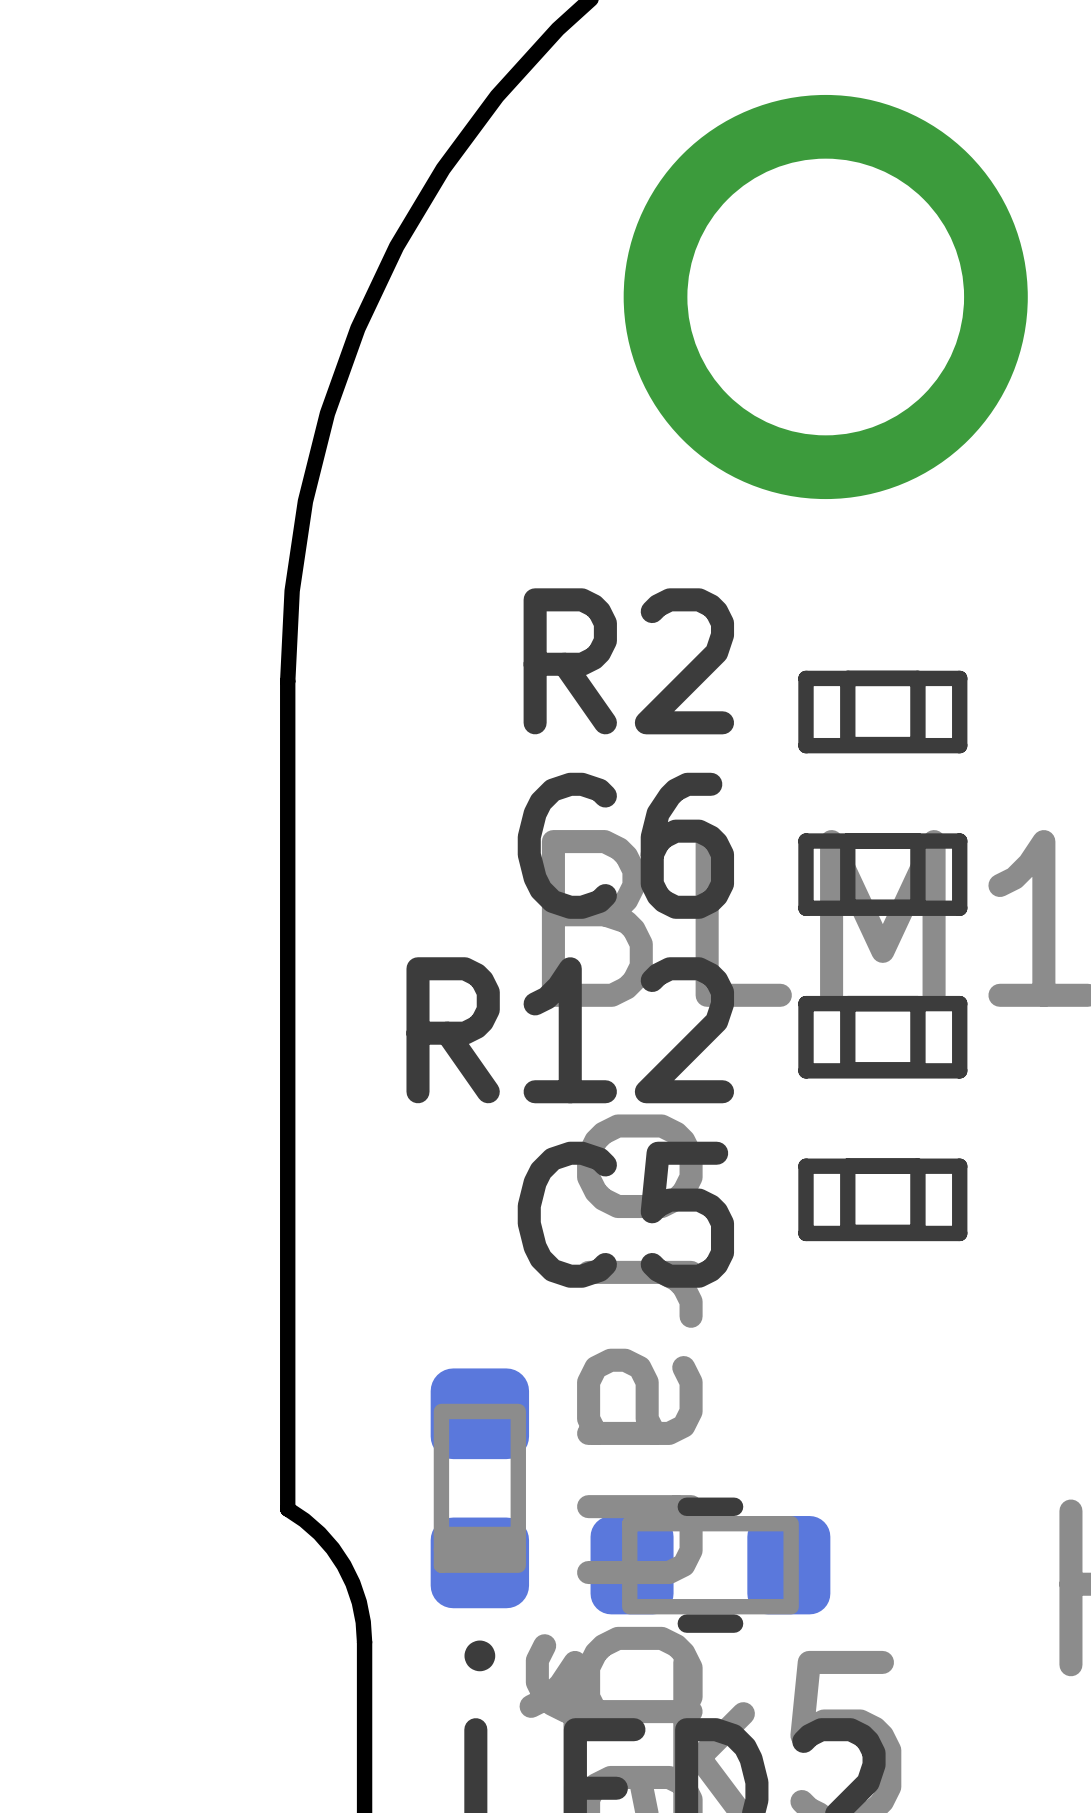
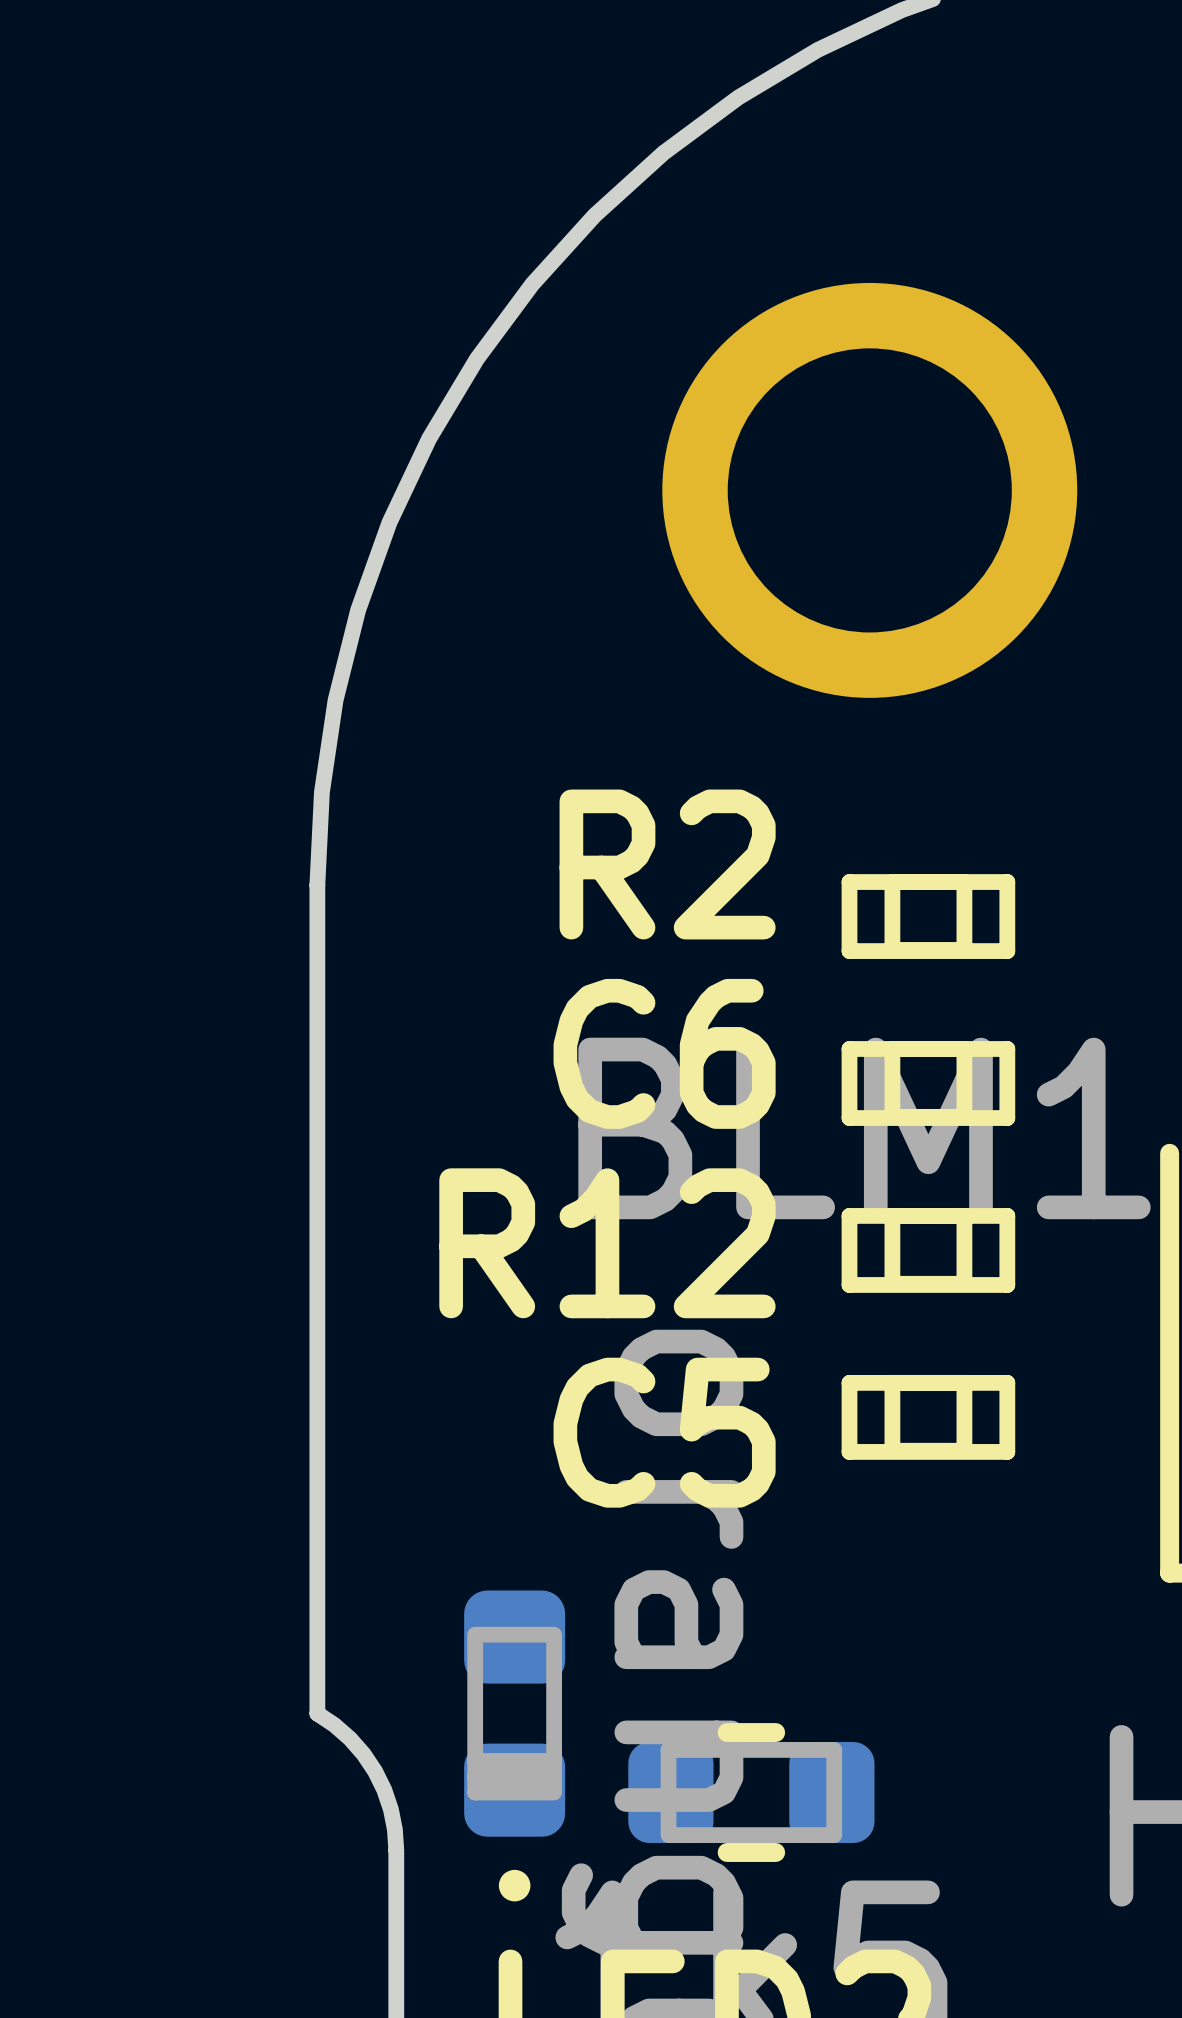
board edge: (287, 1488) (287, 1509) (319, 1533) (343, 1565) (359, 1602) (364, 1642) -> (317, 1713) (350, 1738) (375, 1771) (390, 1809) (394, 1829) (396, 1871)

